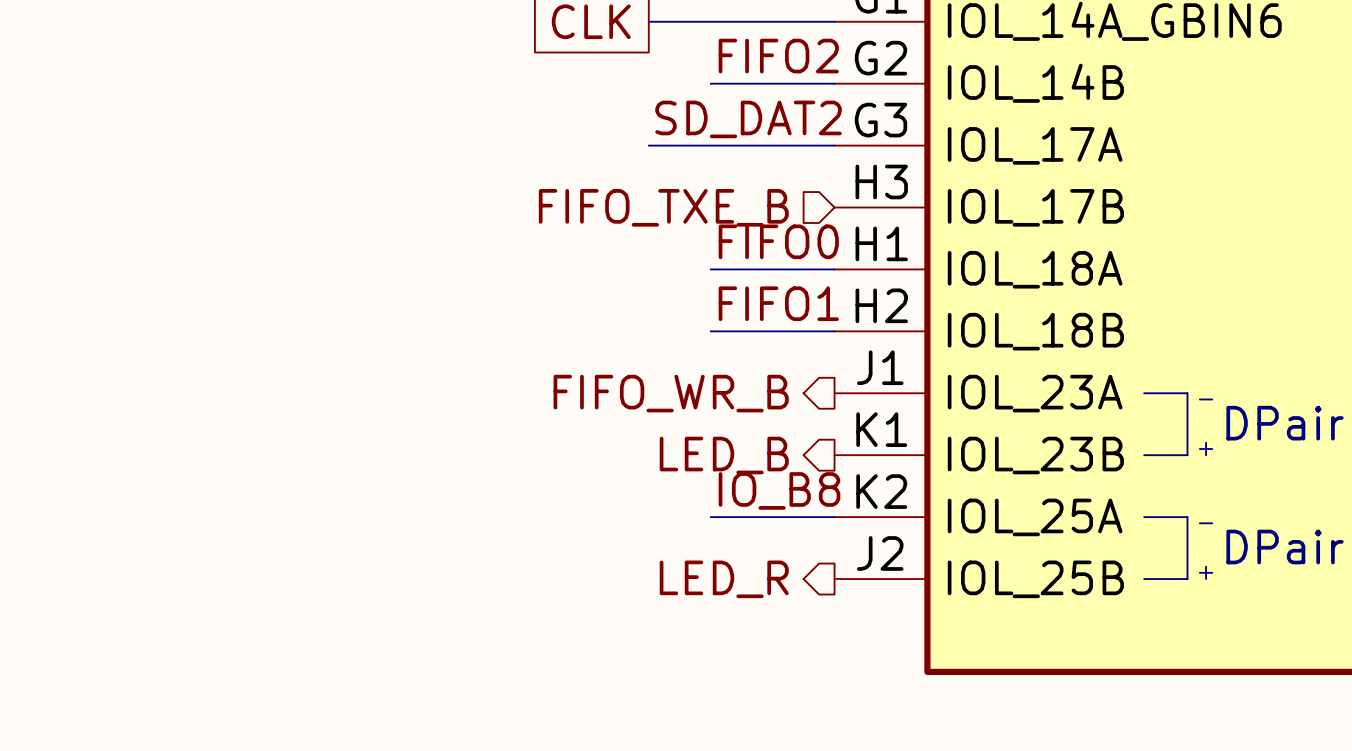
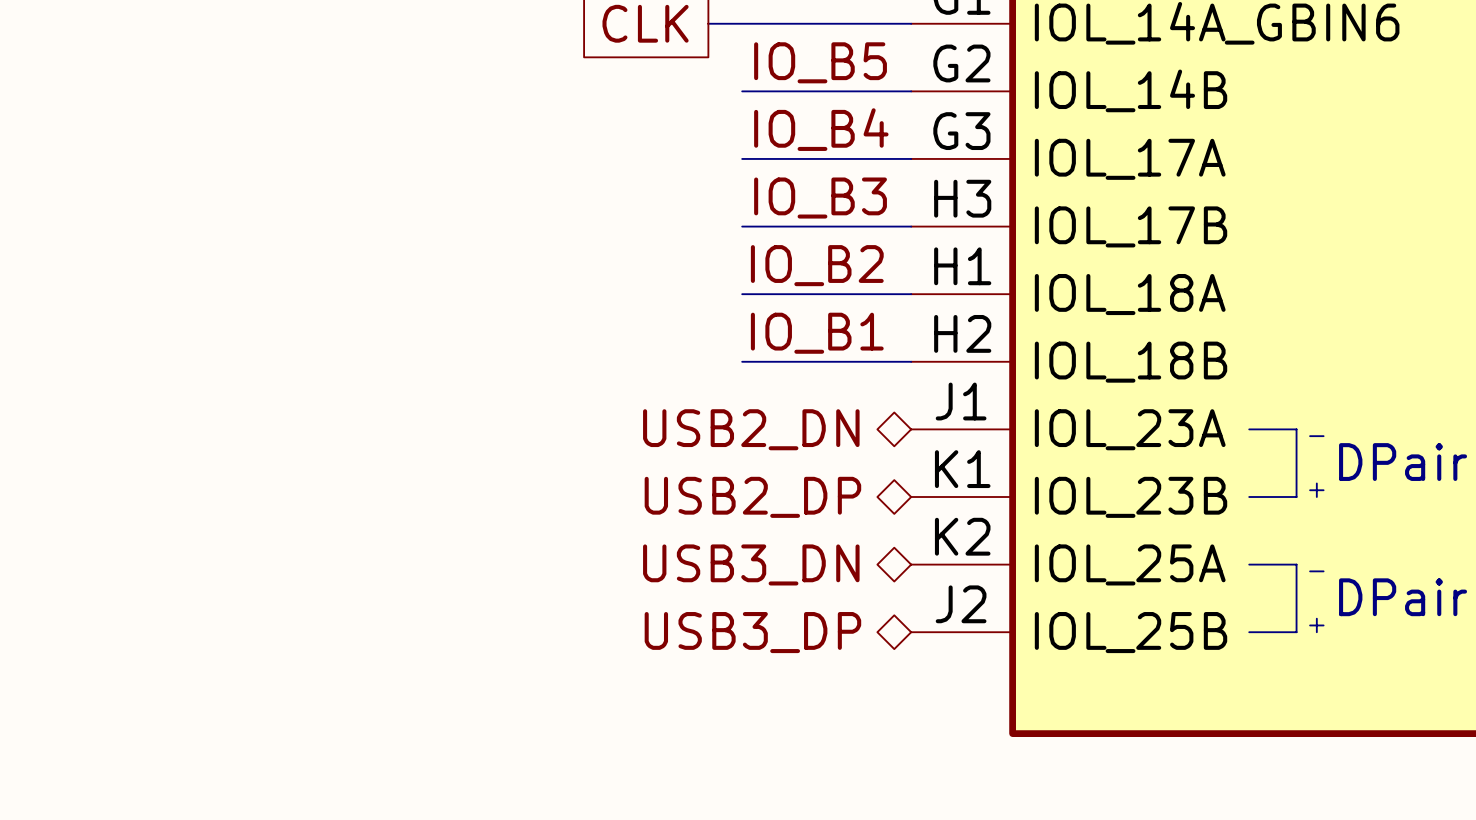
label: FIFO2 (778, 56) -> none
label: none -> IO_B5 (820, 62)
label: none -> IO_B4 (821, 129)
label: SD_DAT2 (748, 119) -> none
wire: (648, 145) (679, 145) -> (742, 91) (775, 91)
label: none -> IO_B3 (820, 198)
hierarchical label: FIFO_TXE_B (663, 207) -> none
wire: none -> (742, 226) (911, 226)
label: FIFO0 (778, 241) -> none
label: none -> IO_B2 (817, 265)
wire: none -> (742, 294) (775, 294)
label: FIFO1 (778, 303) -> none
label: none -> IO_B1 (817, 333)
wire: none -> (742, 361) (775, 361)
hierarchical label shape: output (671, 393) -> bidirectional (751, 429)
hierarchical label: FIFO_WR_B (671, 393) -> USB2_DN (751, 429)
hierarchical label shape: output (724, 455) -> bidirectional (752, 497)
hierarchical label: LED_B (724, 455) -> USB2_DP (752, 497)
label: IO_B8 (779, 490) -> none
hierarchical label: none -> USB3_DN (751, 564)
wire: (710, 517) (834, 517) -> none
hierarchical label shape: output (724, 579) -> bidirectional (752, 632)
hierarchical label: LED_R (724, 579) -> USB3_DP (752, 632)

